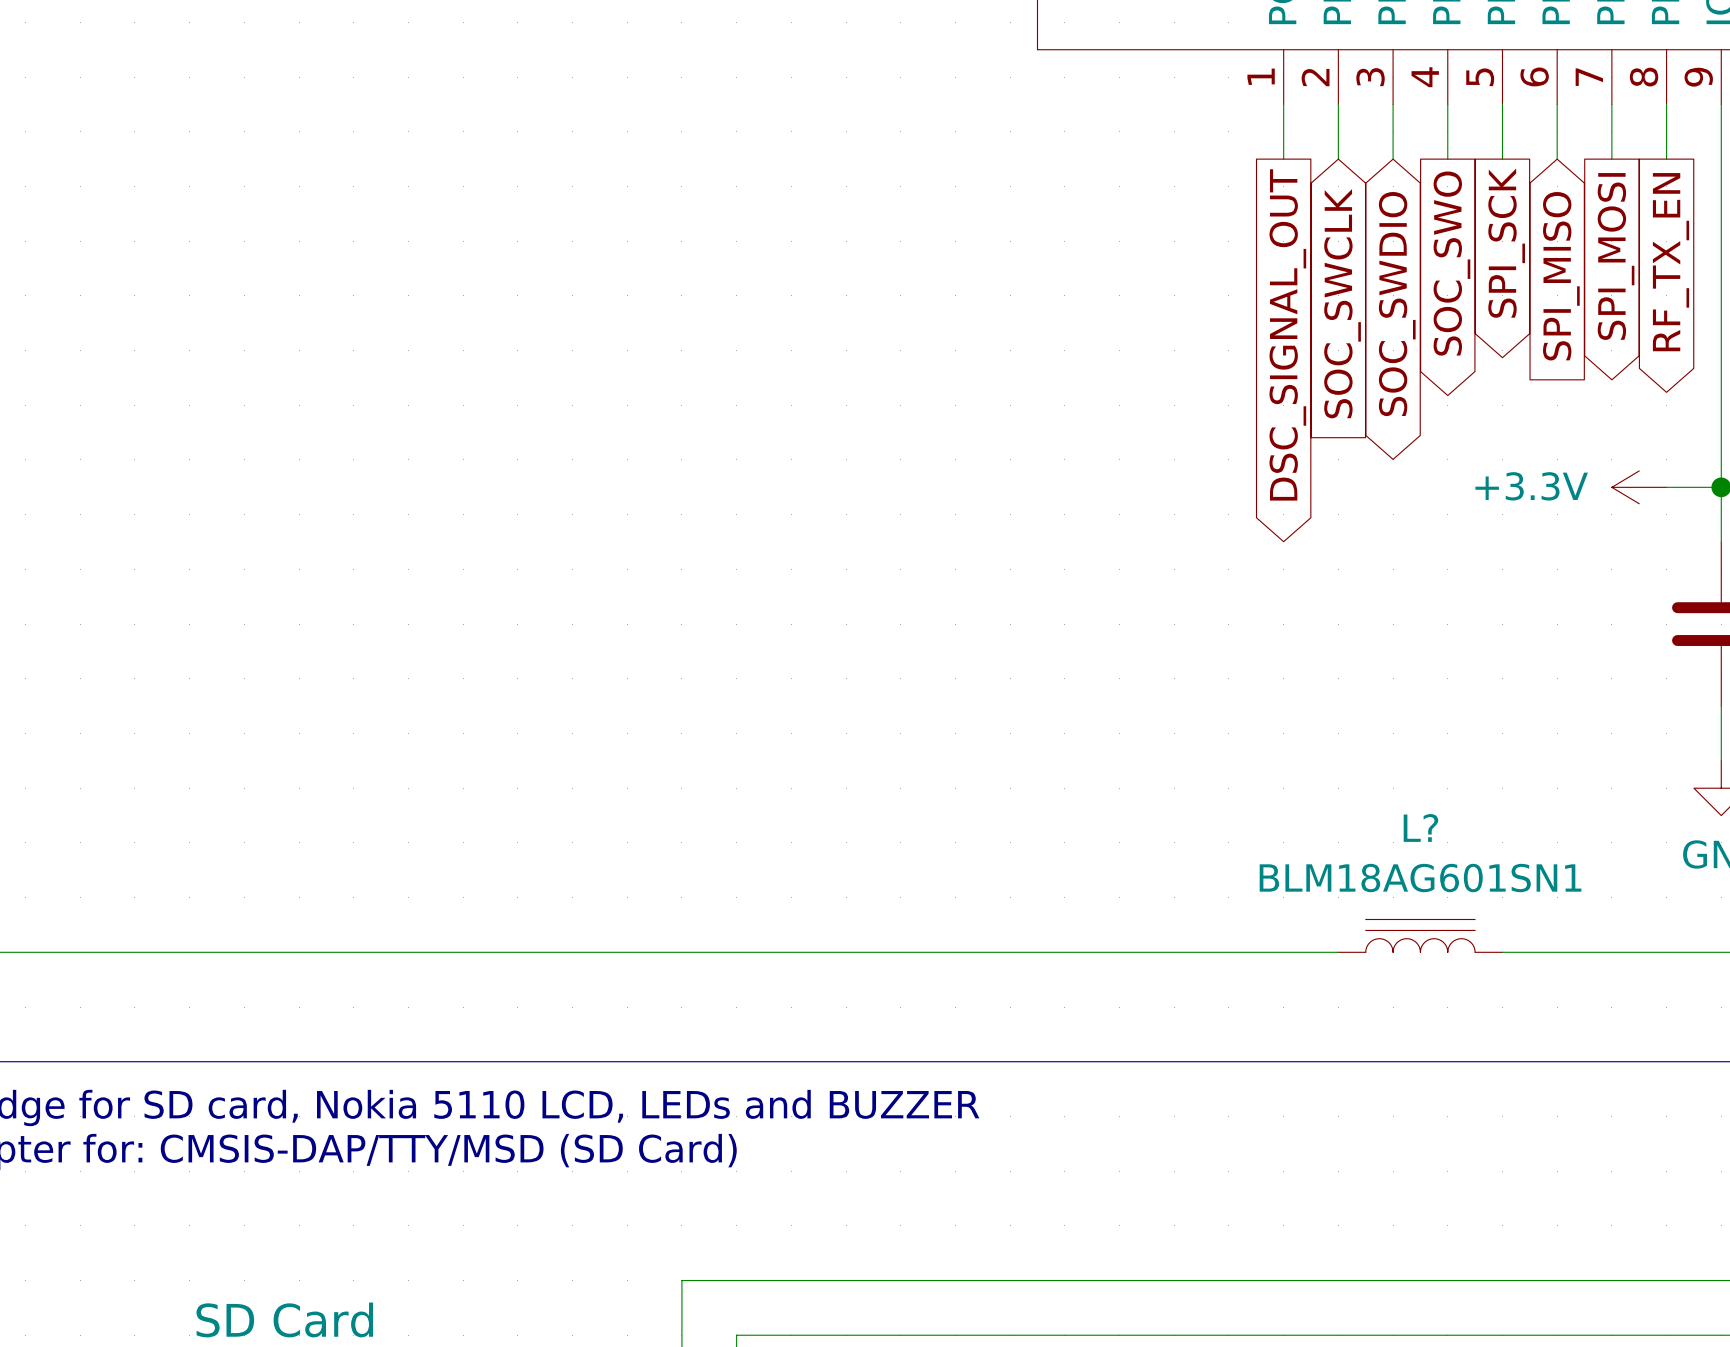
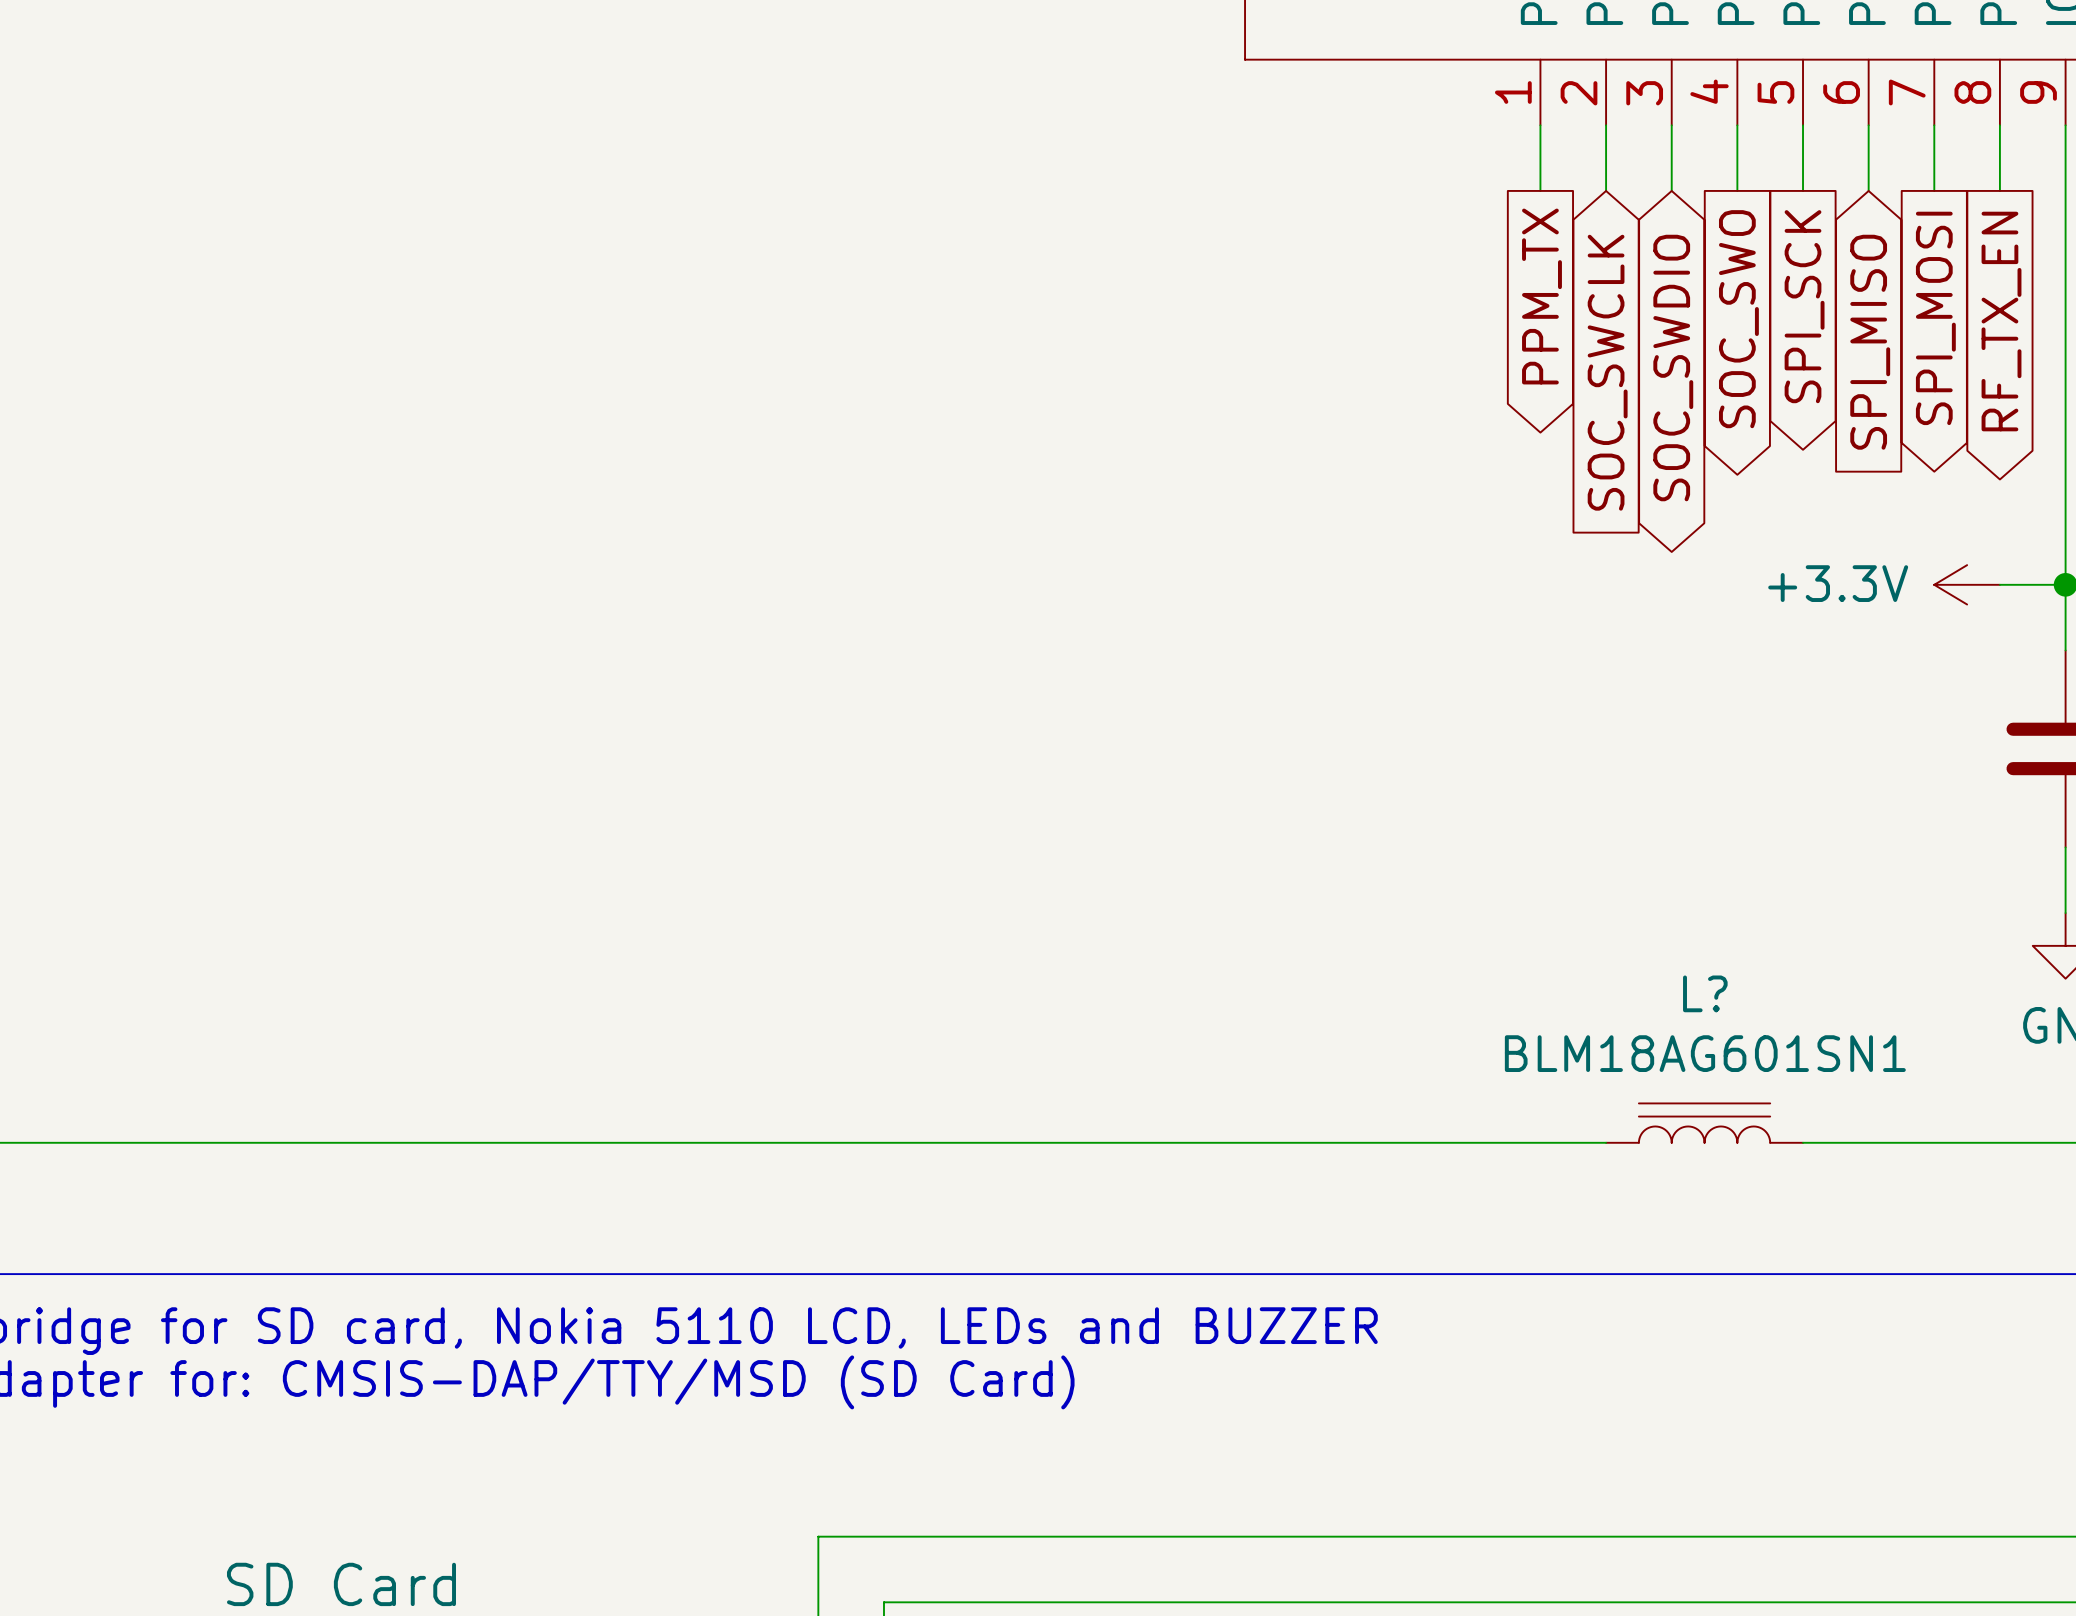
global label: DSC_SIGNAL_OUT (1287, 334) -> PPM_TX (1541, 296)

